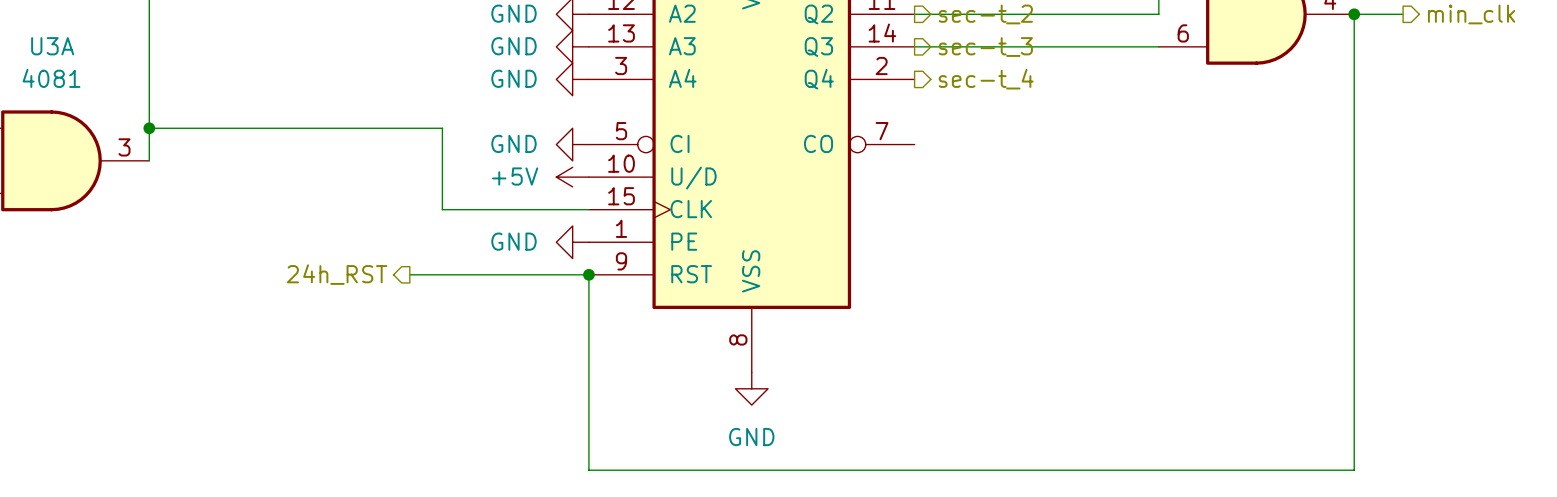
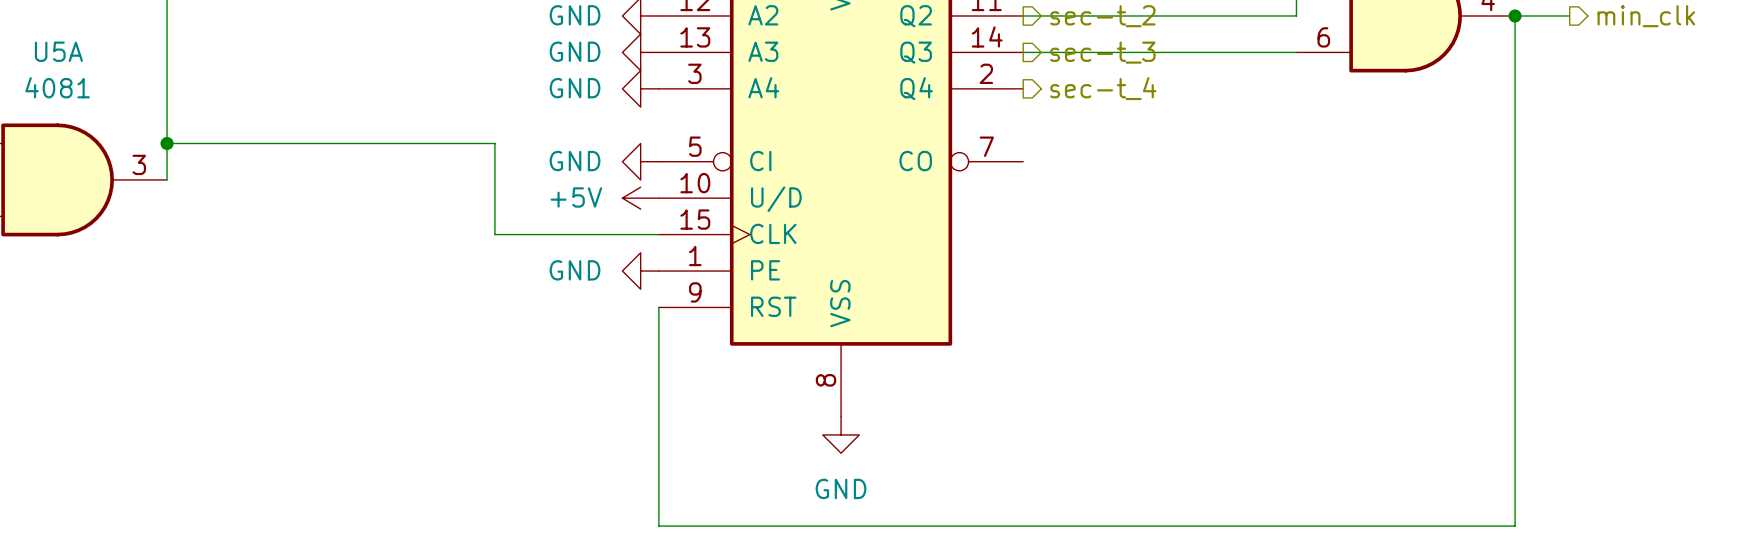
U3A name: U3A (52, 46) -> U5A (58, 51)
hierarchical label: 24h_RST (337, 274) -> none
wire: (409, 274) (588, 274) -> none
junction: (588, 274) -> none

